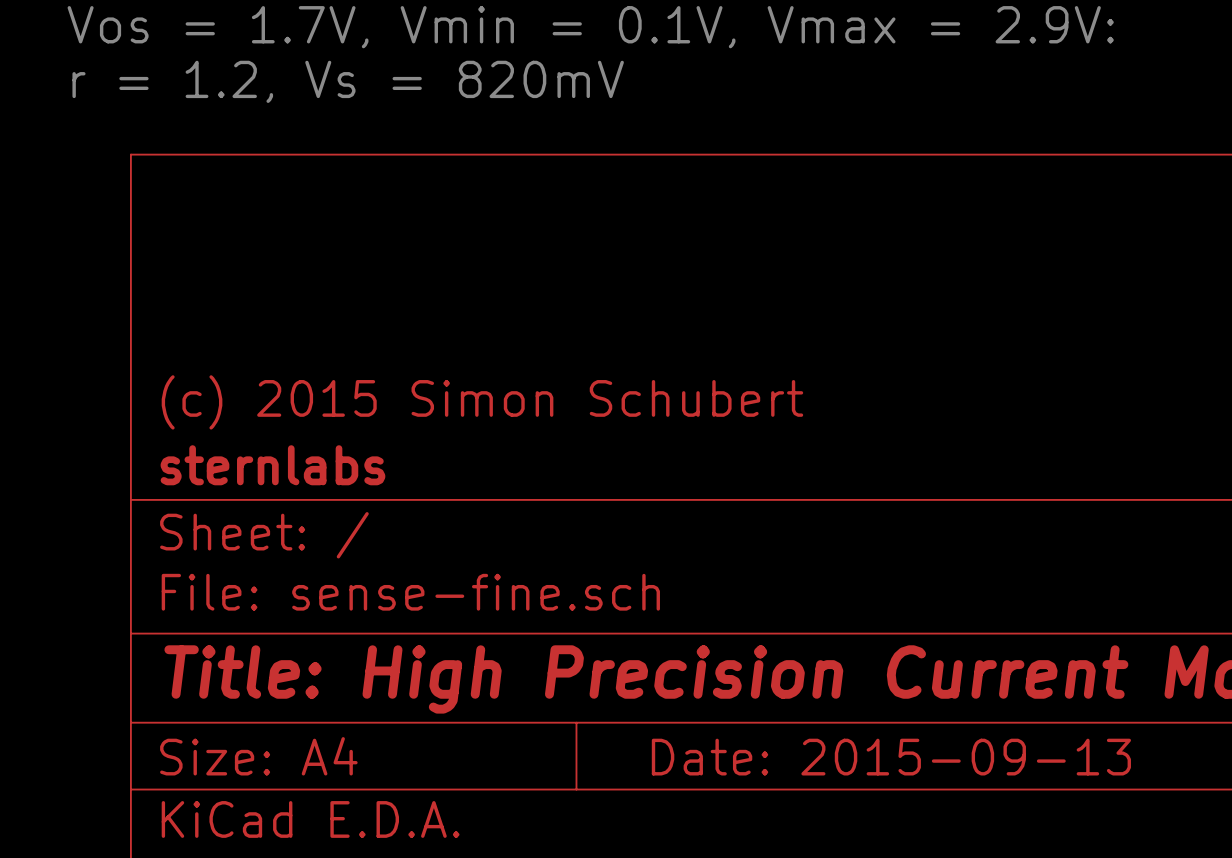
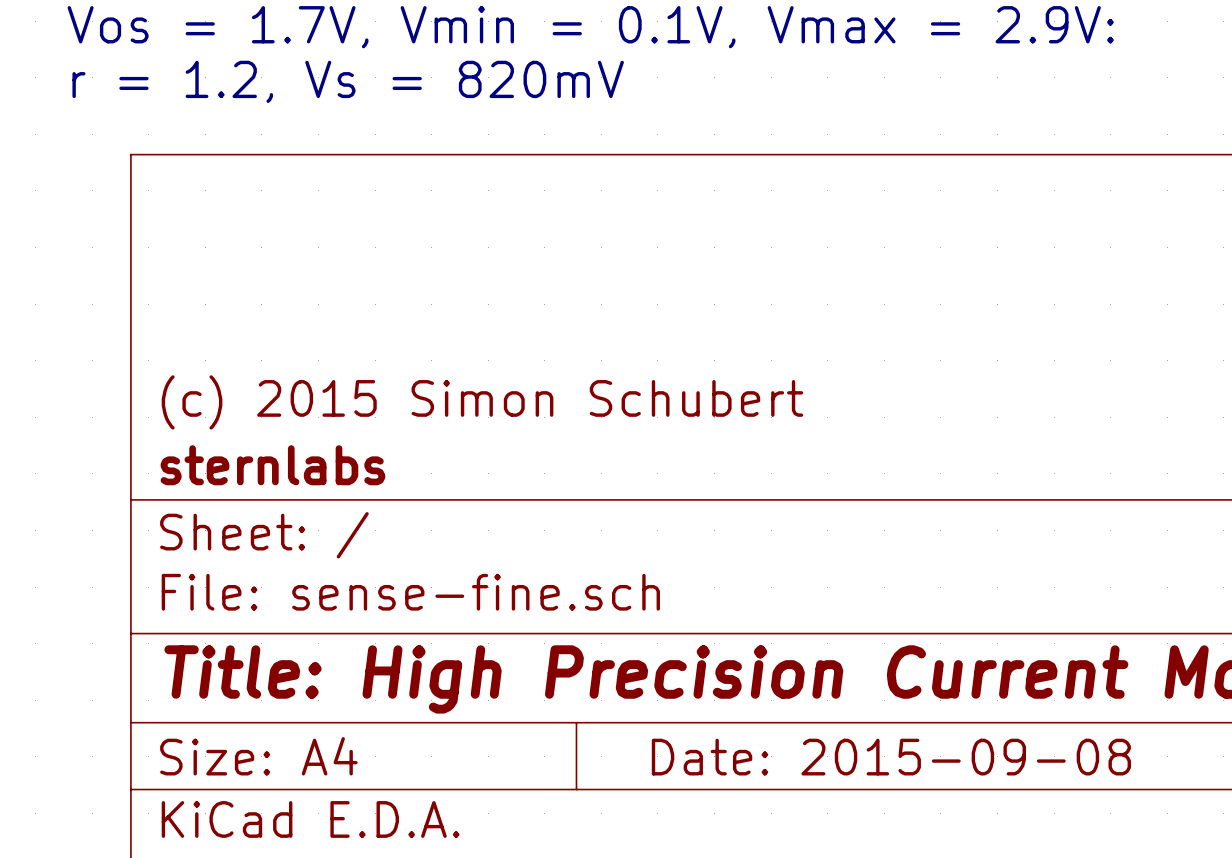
title block: Date: 2015-09-13 (891, 757) -> Date: 2015-09-08 (891, 757)

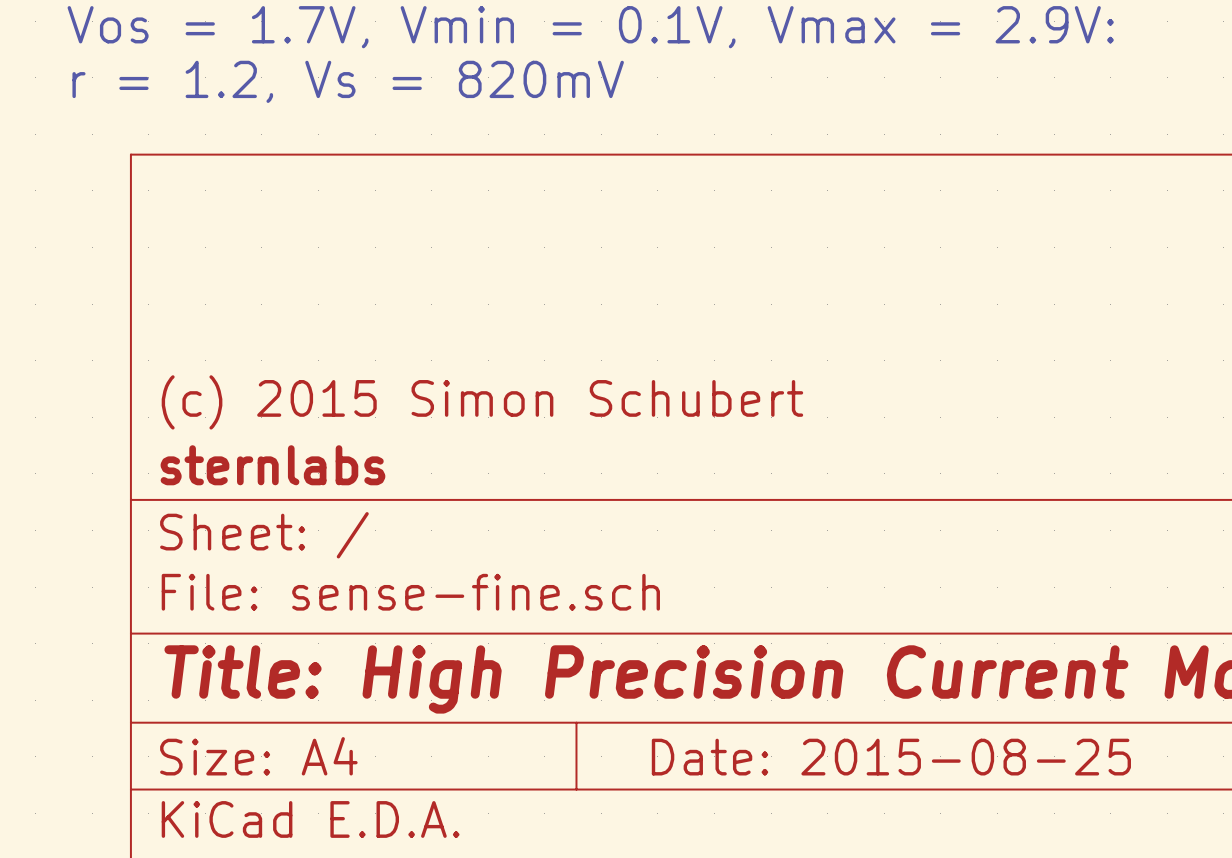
title block: Date: 2015-09-08 (891, 757) -> Date: 2015-08-25 (891, 757)

